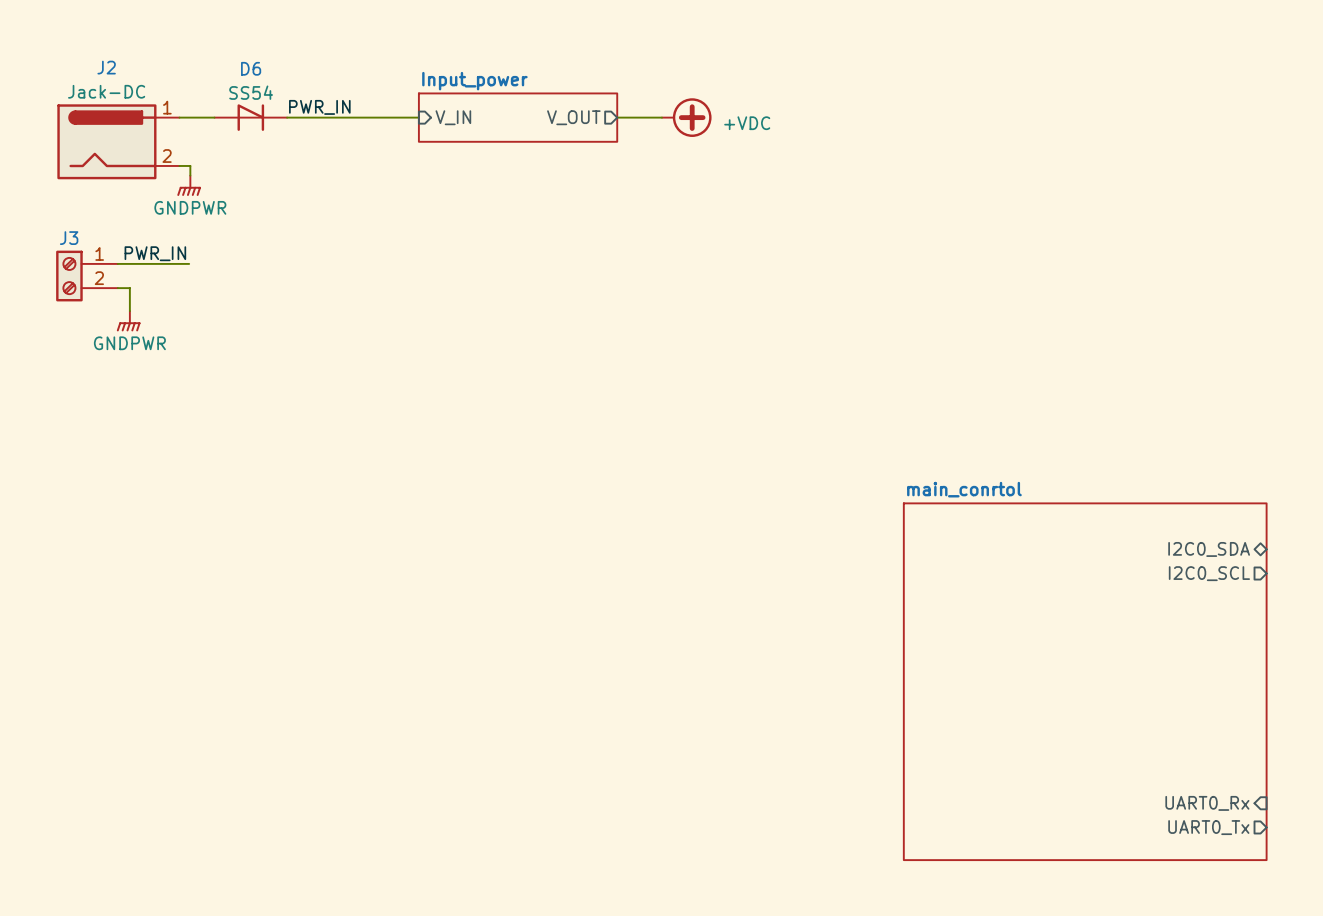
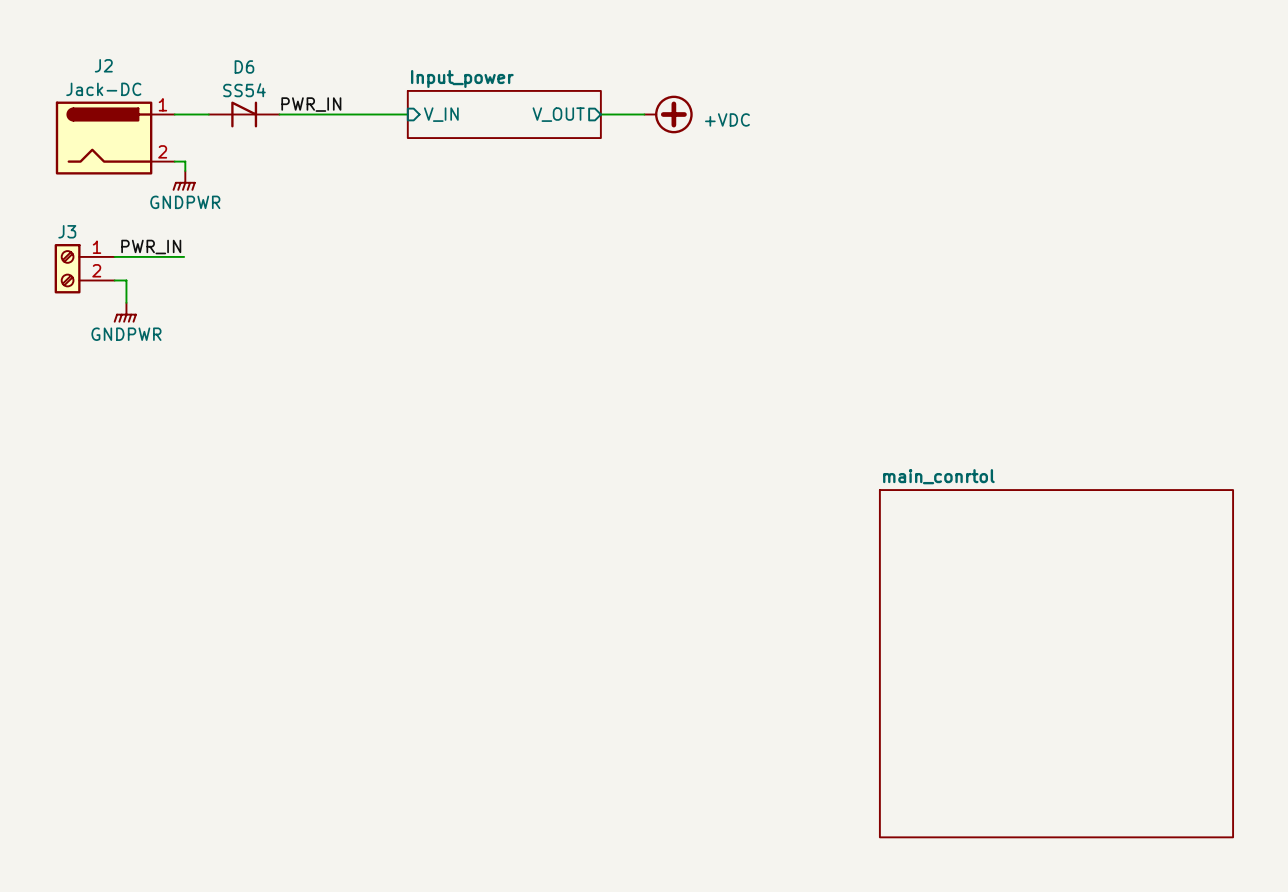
sheet pin: I2C0_SDA (1209, 549) -> none
sheet pin: I2C0_SCL (1209, 573) -> none
sheet pin: UART0_Rx (1207, 803) -> none
sheet pin: UART0_Tx (1208, 827) -> none

